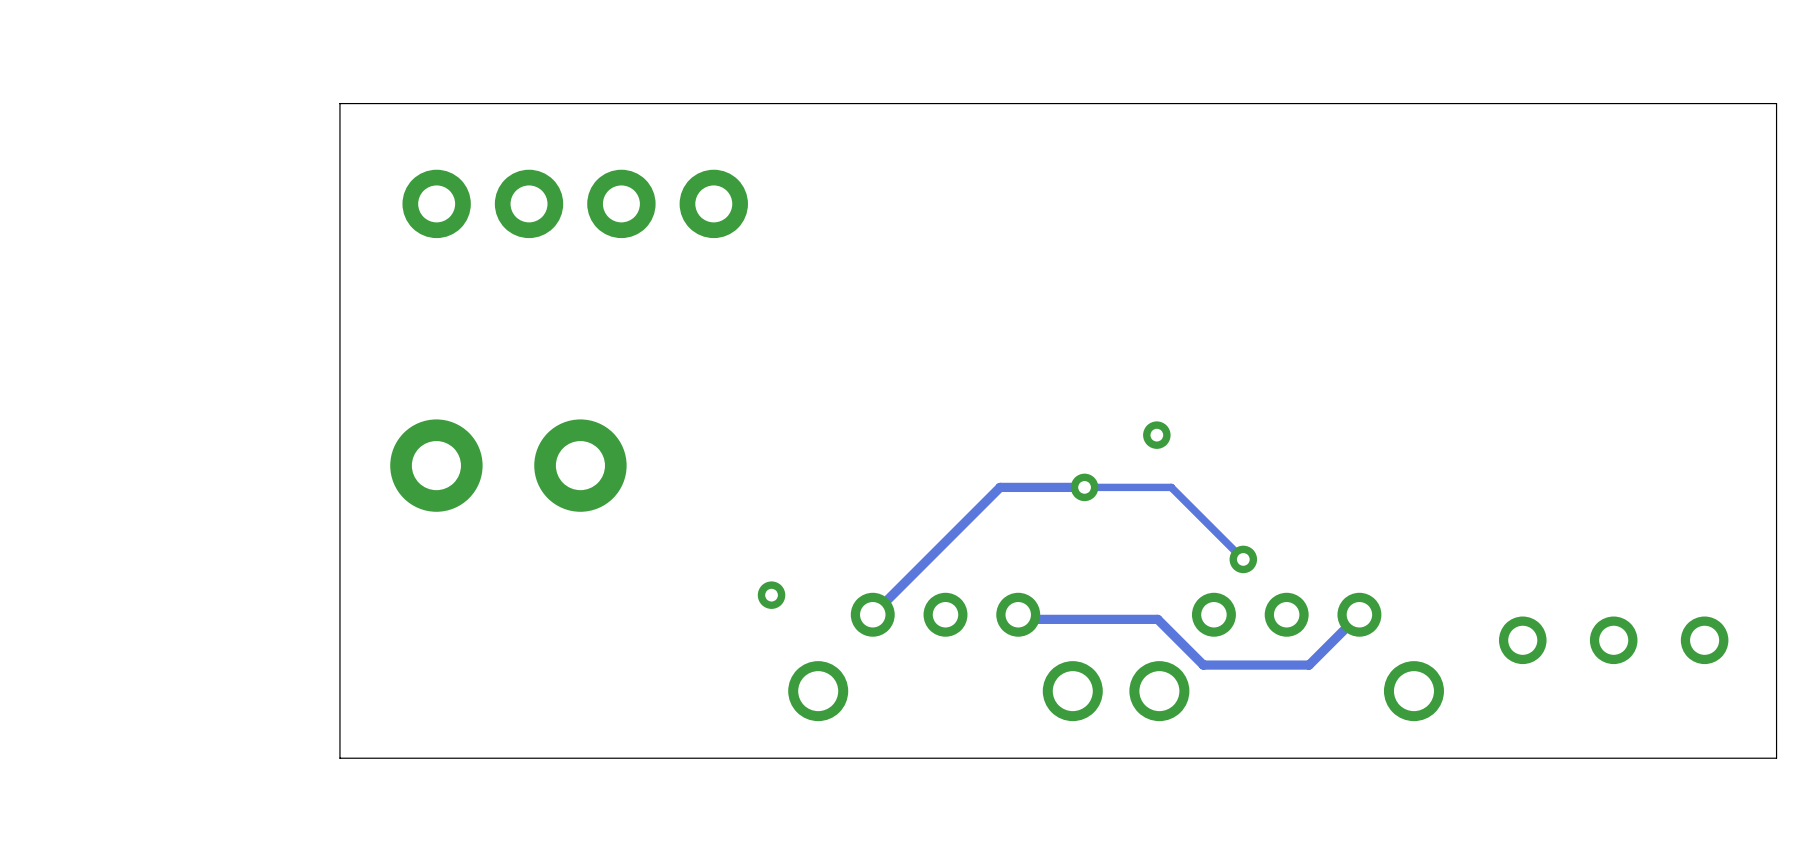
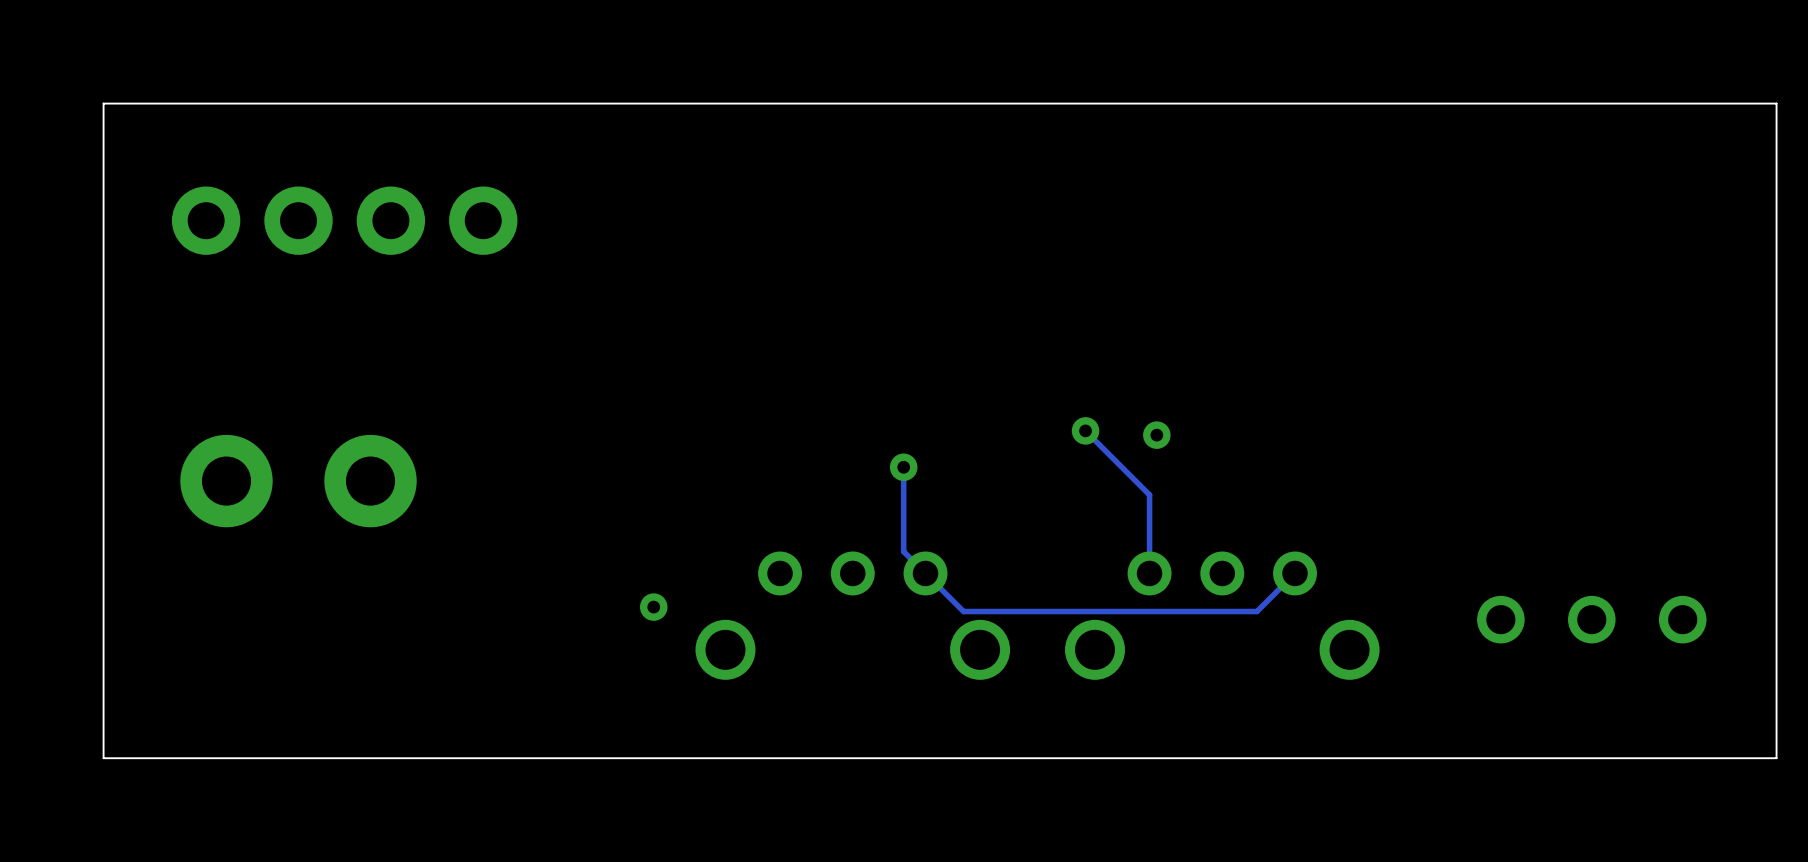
board edge: (339, 103) (339, 758) -> (339, 103) (103, 103) (103, 758) (339, 758)
part position: (575, 203) -> (344, 220)
track: none -> (1085, 430) (1149, 494) (1149, 573)
part position: (508, 465) -> (298, 481)
track: none -> (903, 467) (903, 551) (963, 611) (1256, 611) (1295, 573)
via: none -> (903, 467)
via position: (1084, 487) -> (1085, 430)
track: (1243, 559) (1171, 487) (1000, 487) (872, 614) -> none
via: (1243, 559) -> none
via: (771, 595) -> none
via: none -> (653, 607)
track: (1359, 614) (1309, 665) (1203, 665) (1157, 619) (1022, 619) (1018, 614) -> none
part position: (1613, 640) -> (1591, 619)
part position: (945, 656) -> (852, 615)
part position: (1286, 656) -> (1222, 615)

